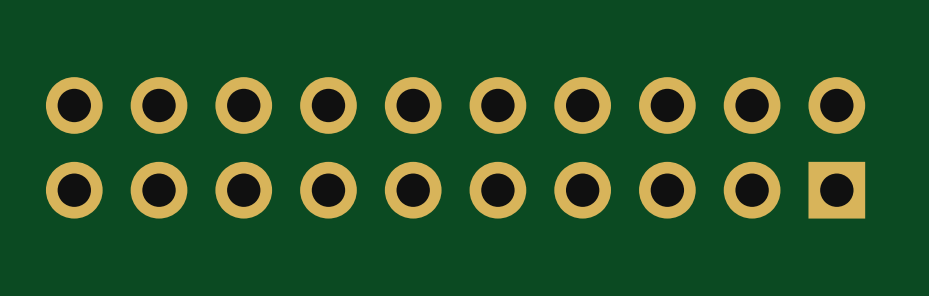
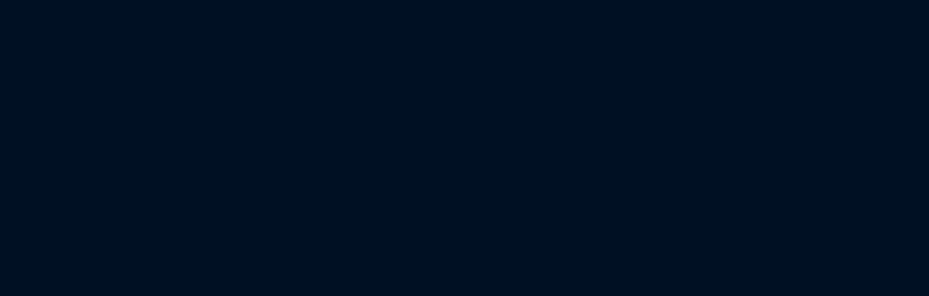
part: (455, 147) -> none

